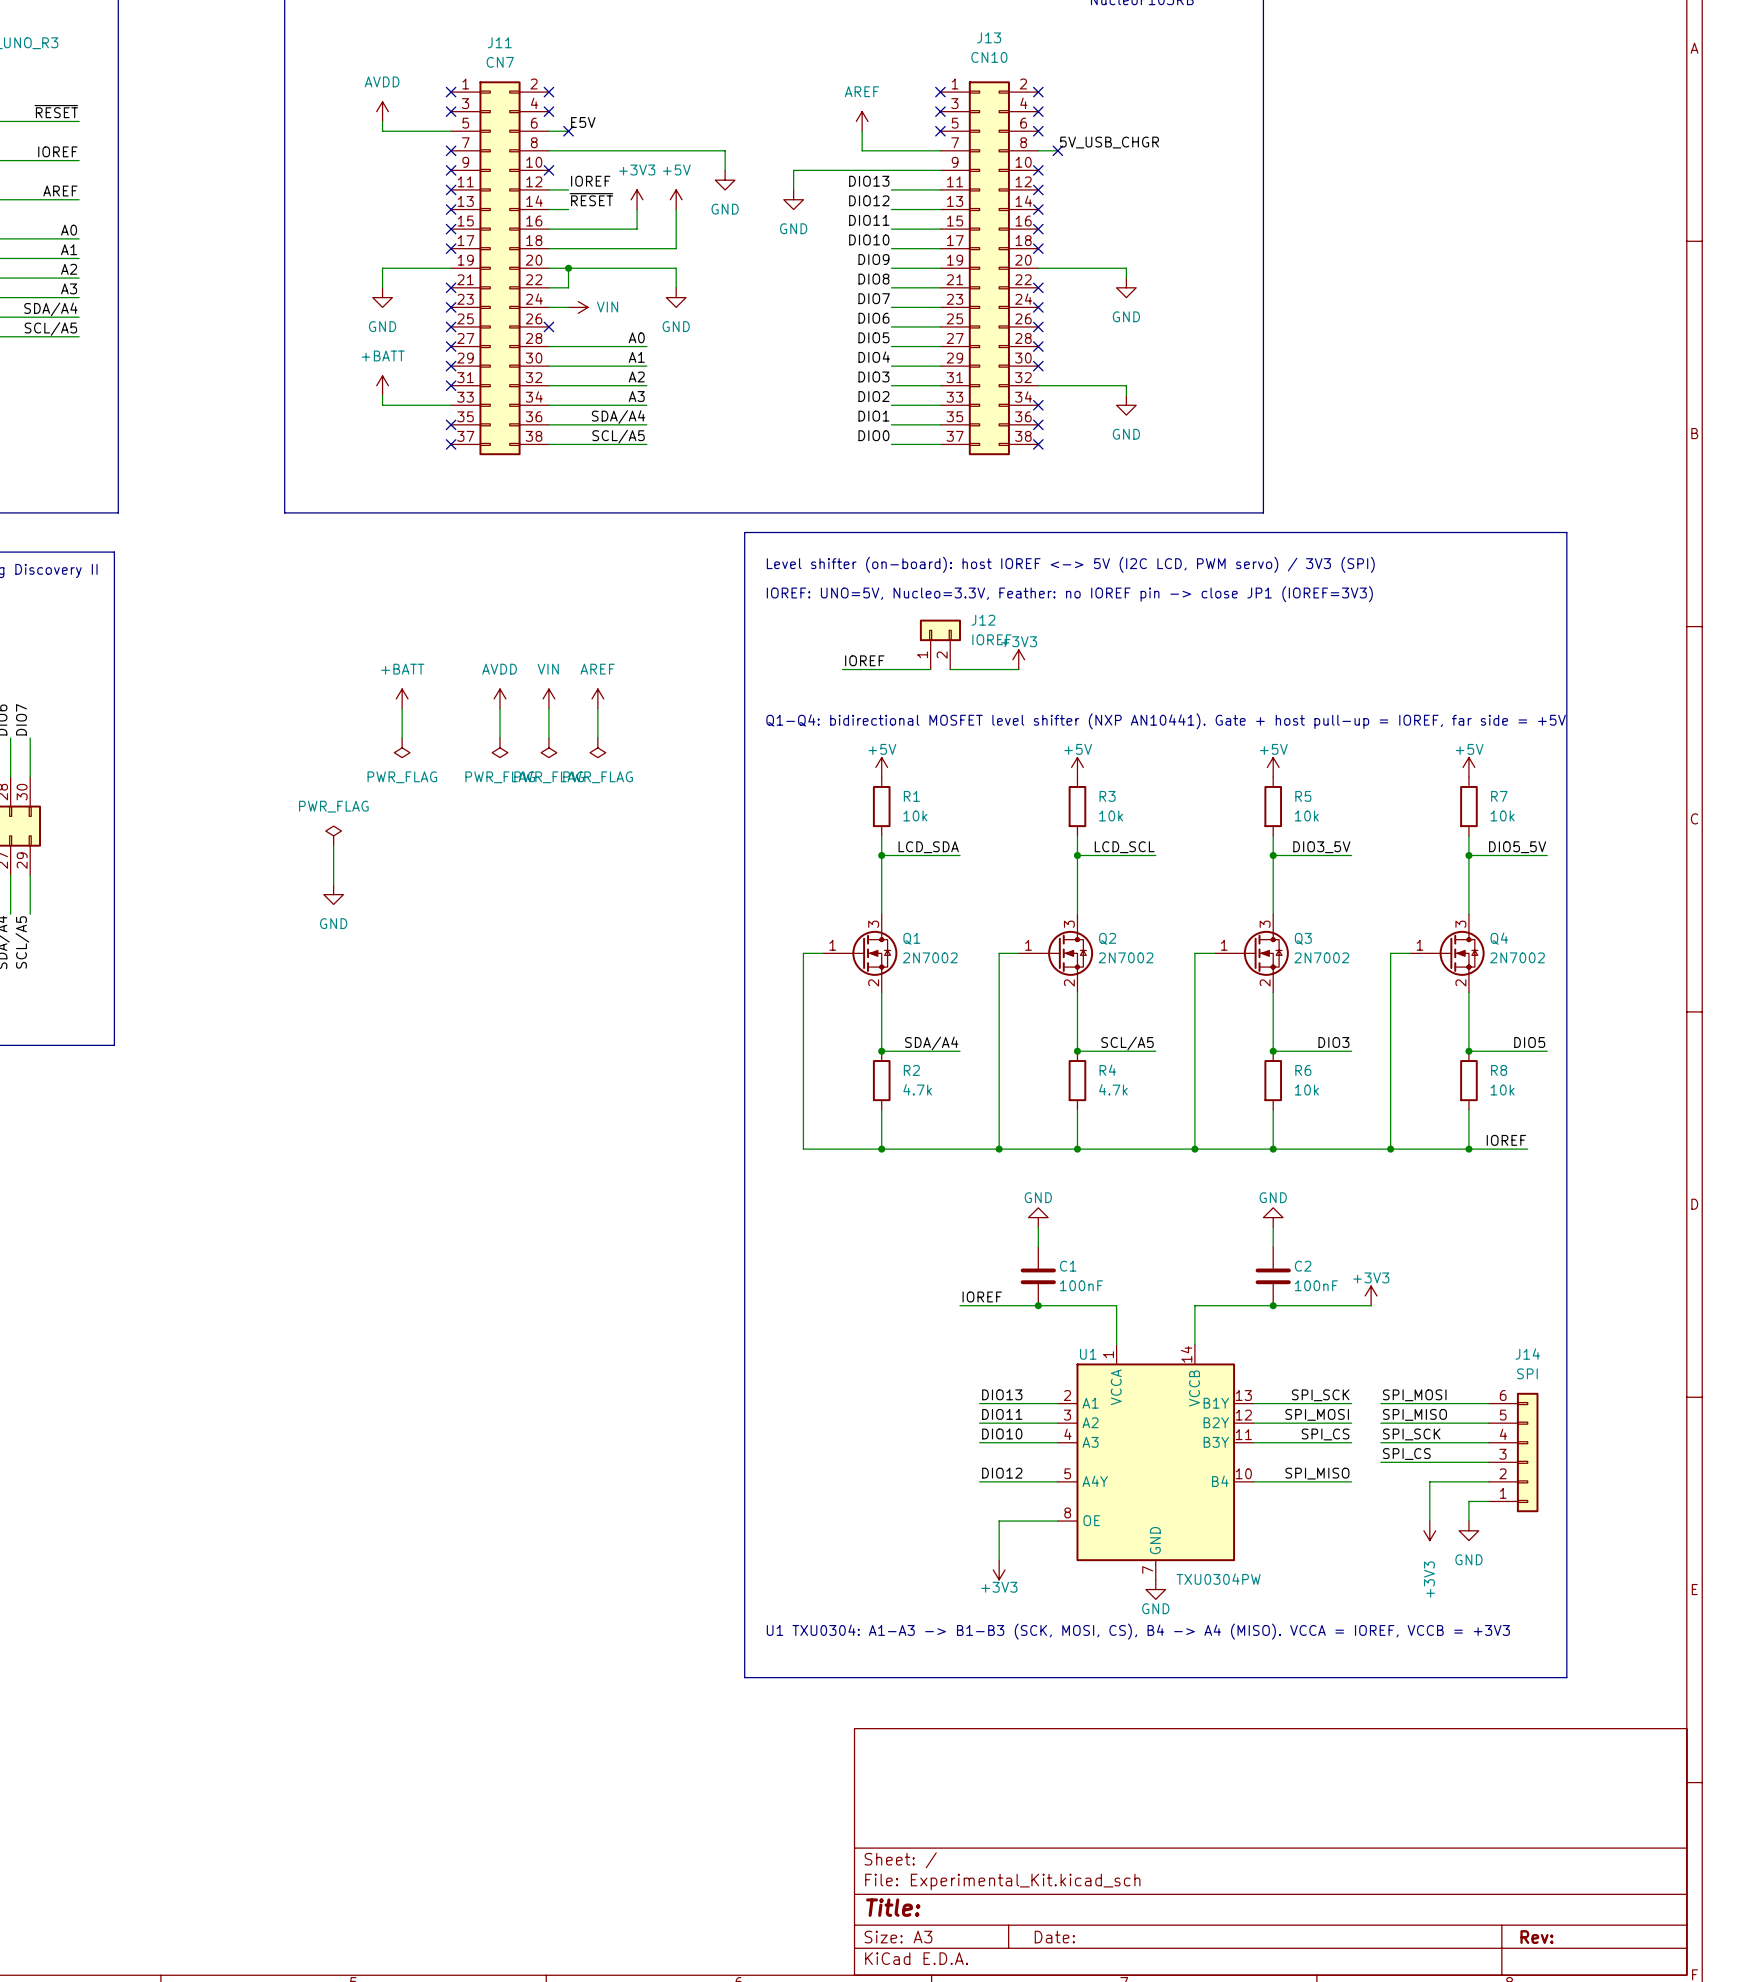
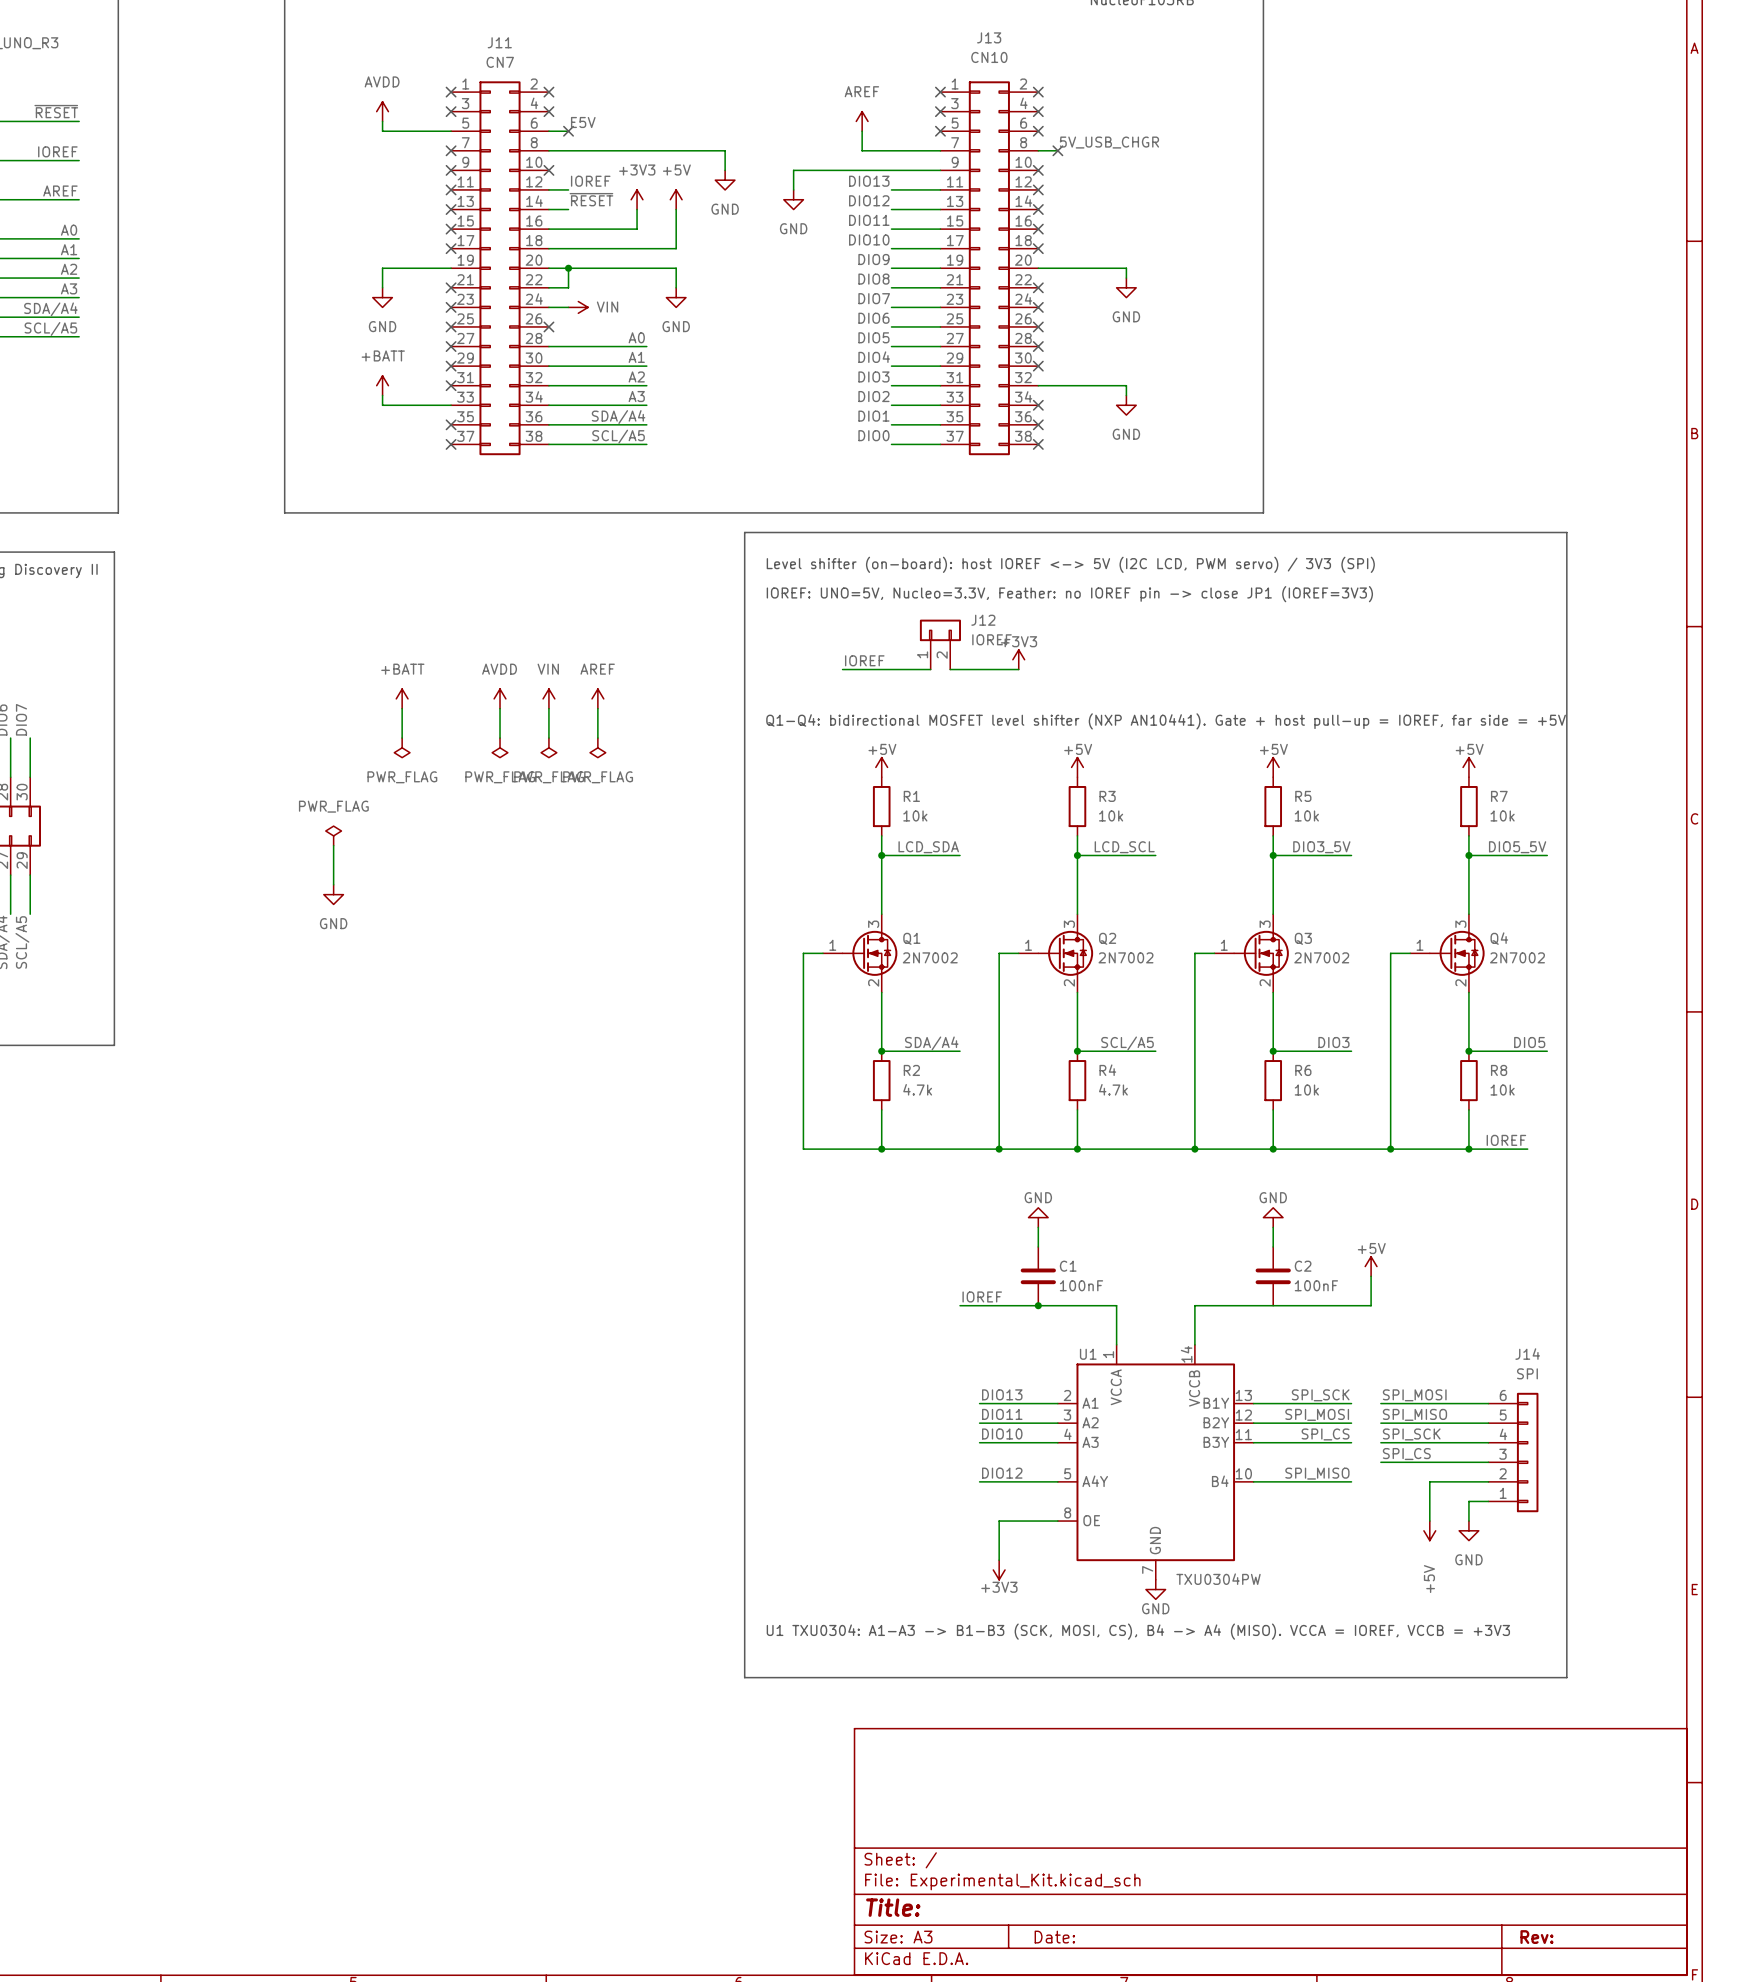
power symbol: none -> +5V (1371, 1266)
power symbol: +3V3 (1371, 1295) -> none
junction: (1273, 1305) -> none
power symbol: +3V3 (1429, 1530) -> +5V (1429, 1530)

